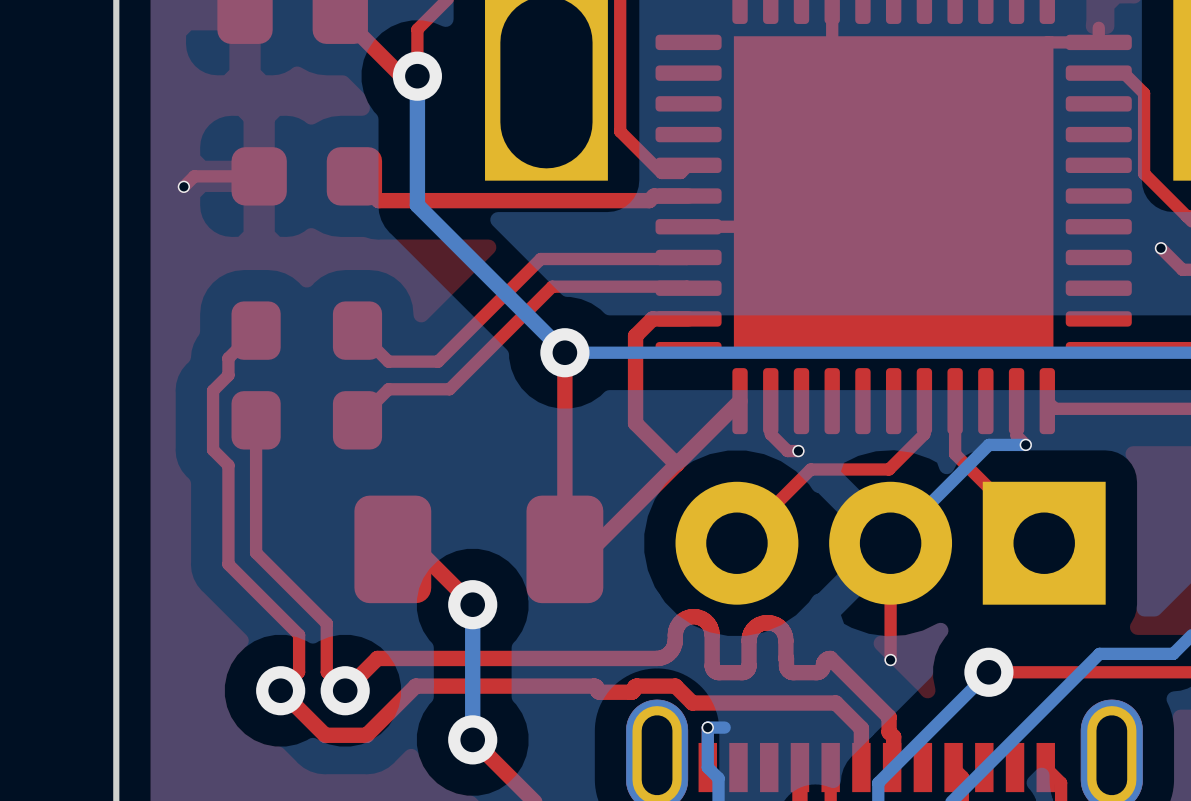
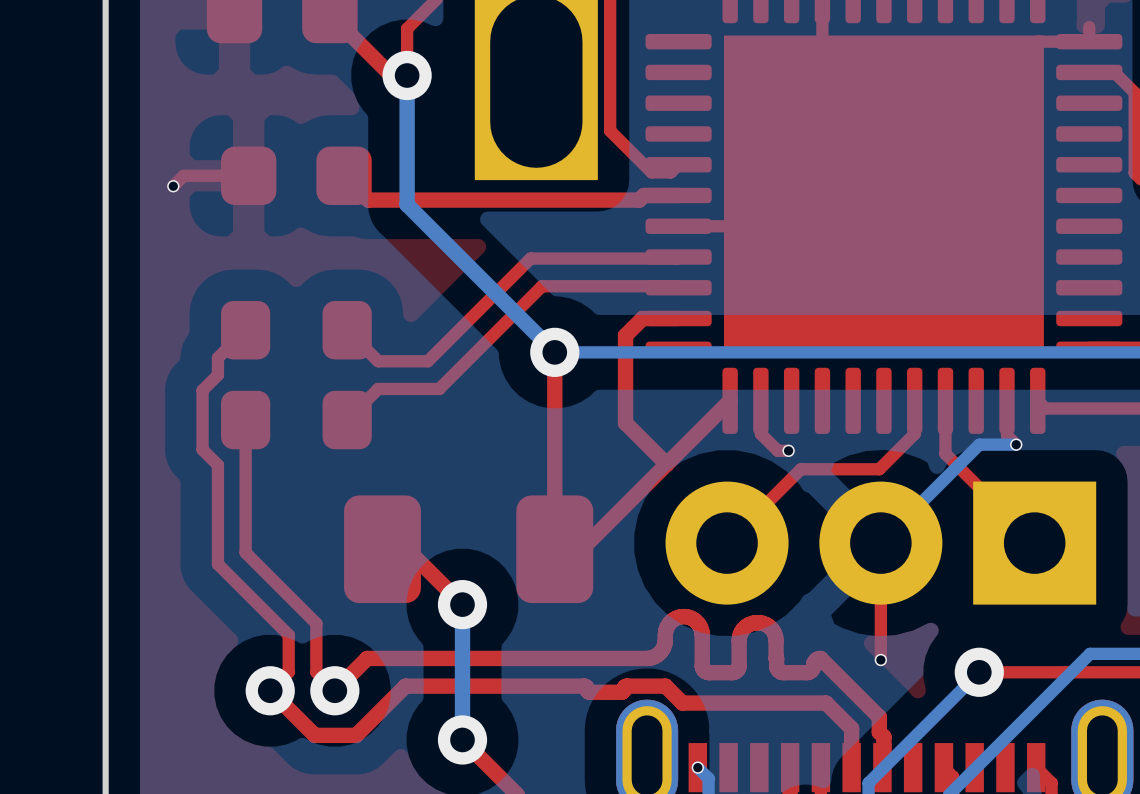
via position: (707, 727) -> (697, 767)
bottom track: (724, 727) (707, 727) (707, 767) -> none

